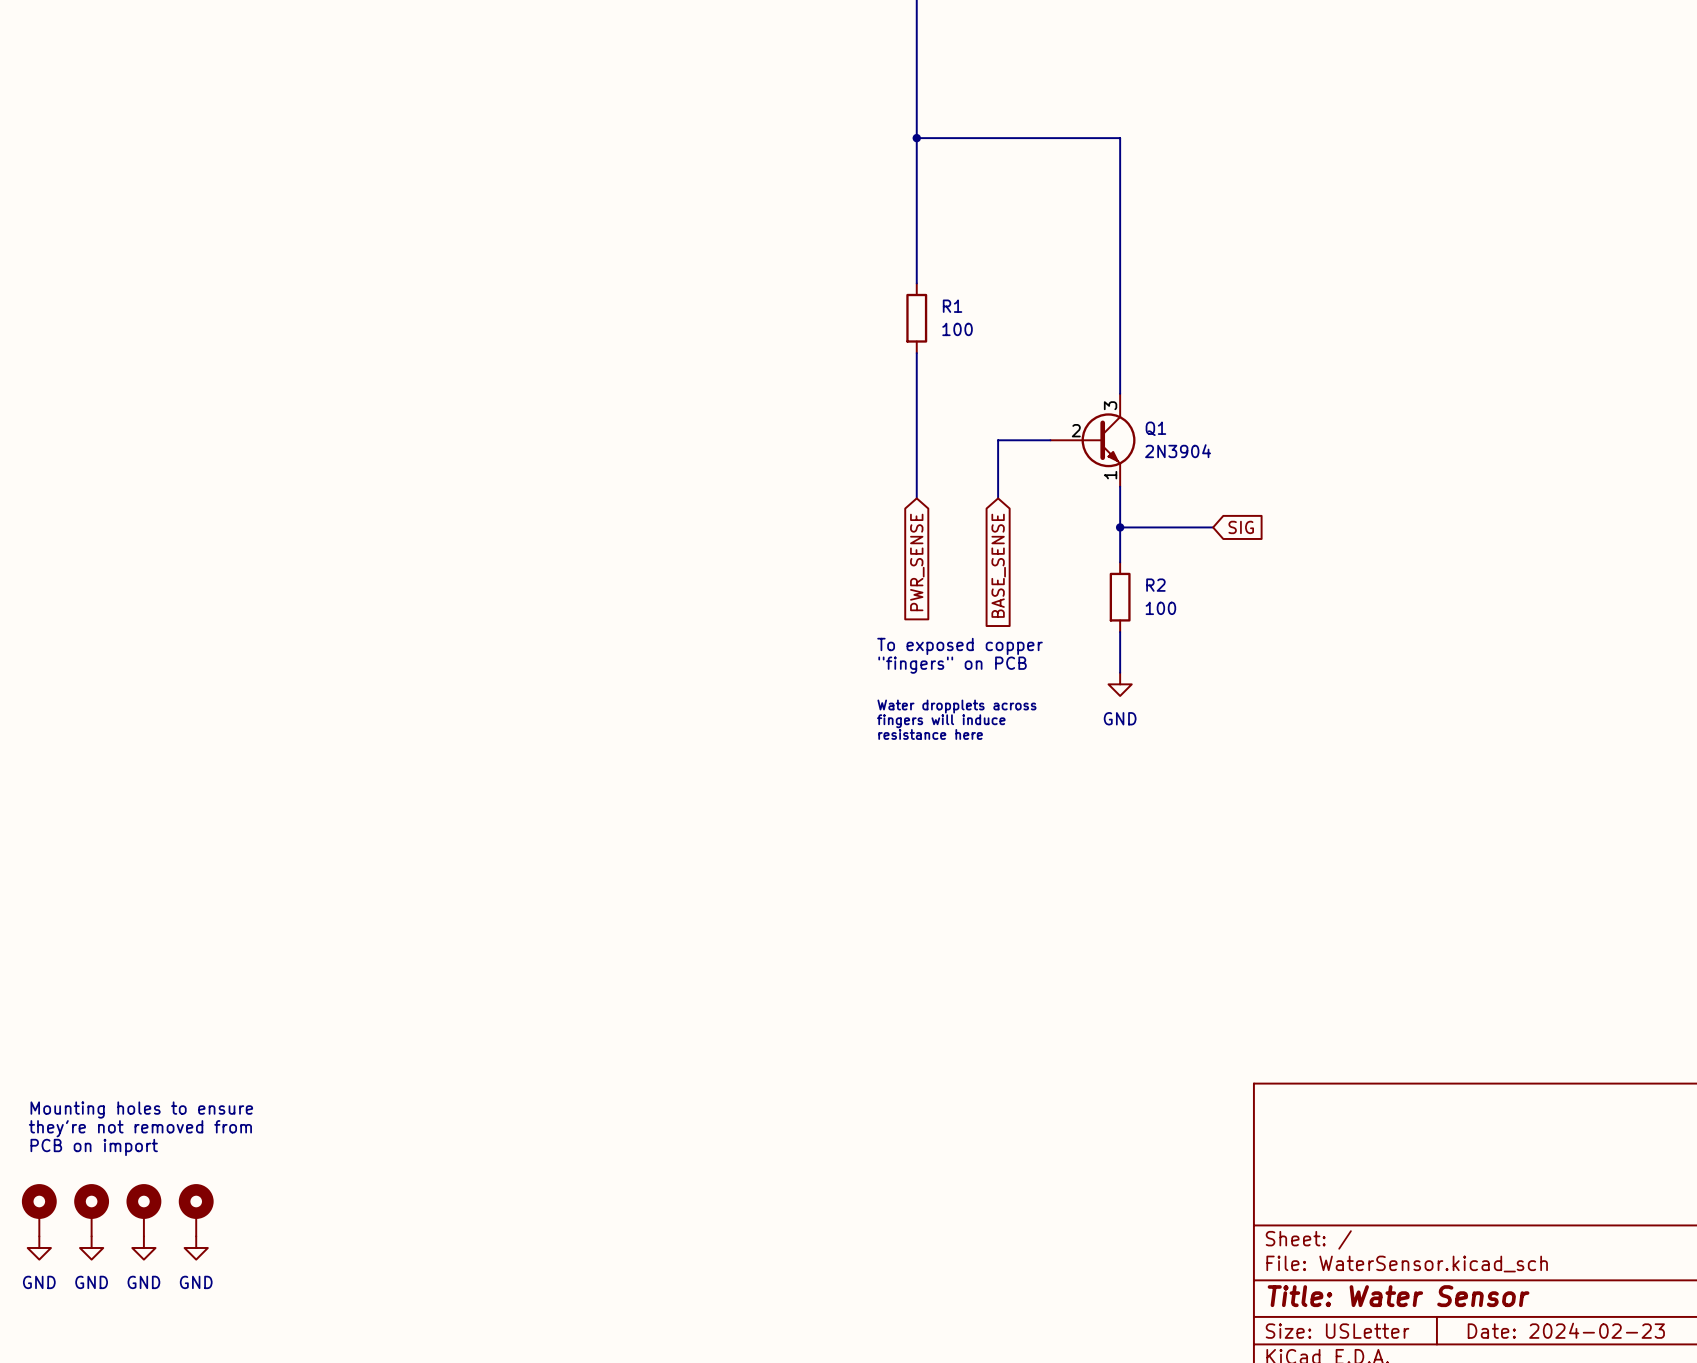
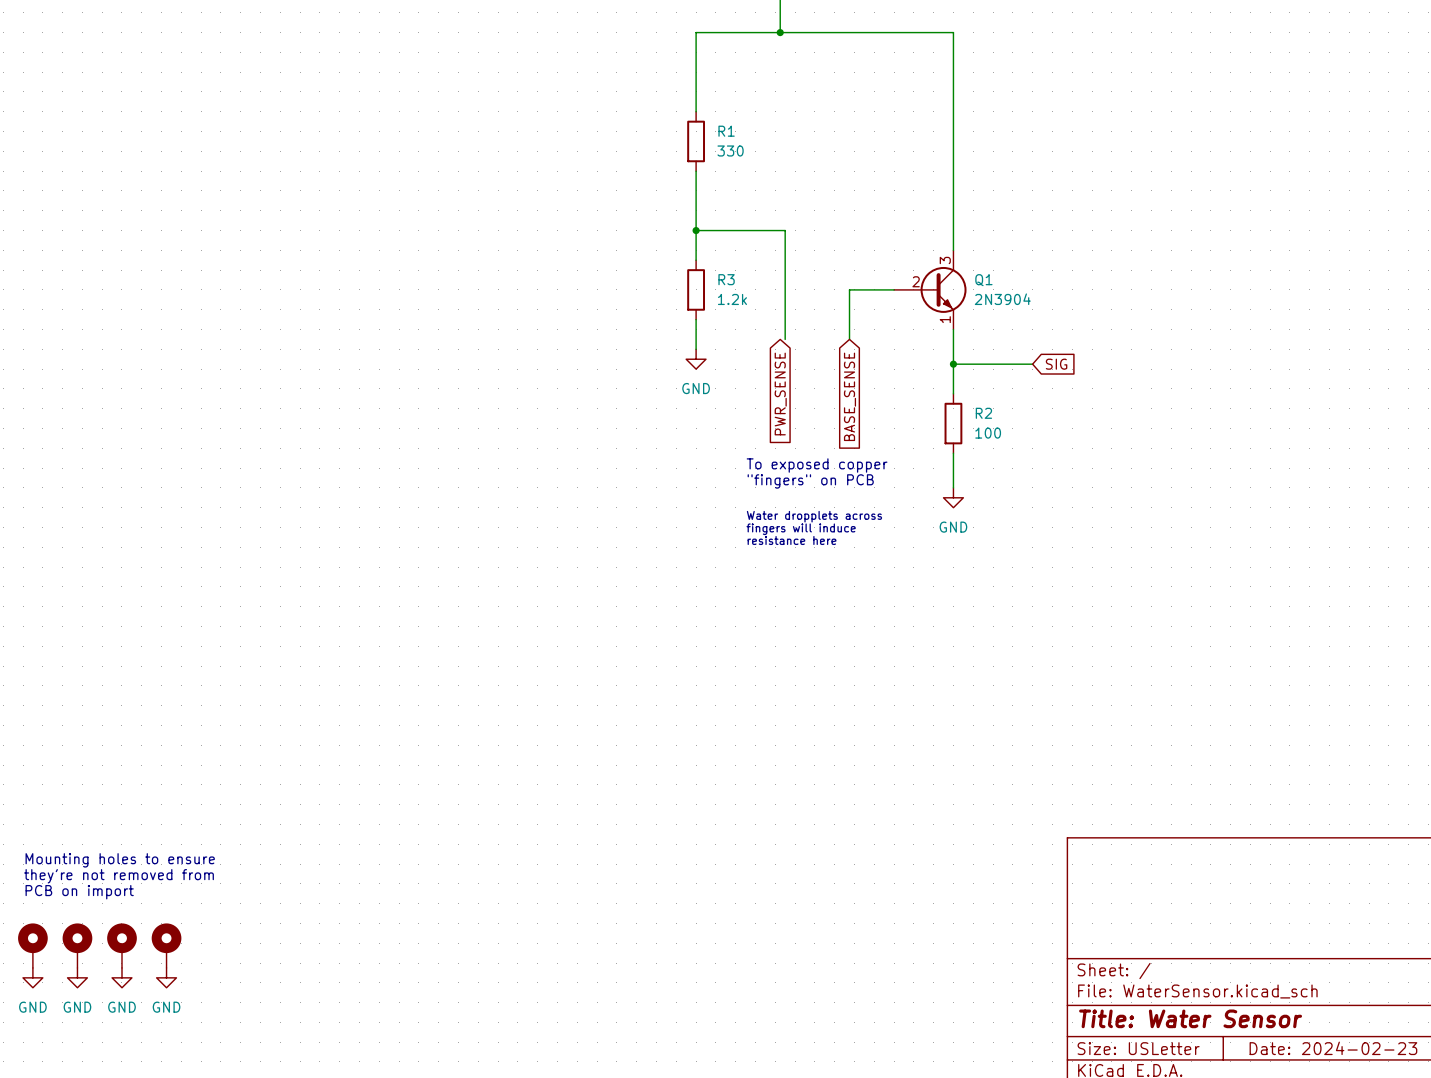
wire: (916, 138) (916, 283) -> (780, 32) (696, 32) (696, 111)
wire: none -> (696, 171) (696, 260)
R1 position: (916, 318) -> (696, 141)
R1 value: 100 (957, 329) -> 330 (730, 150)
wire: (916, 353) (916, 498) -> none
wire: none -> (696, 230) (785, 230) (785, 339)
junction: none -> (696, 230)
R3: none -> 1.2k (696, 289)
wire: none -> (696, 319) (696, 349)
power symbol: none -> GND (696, 359)

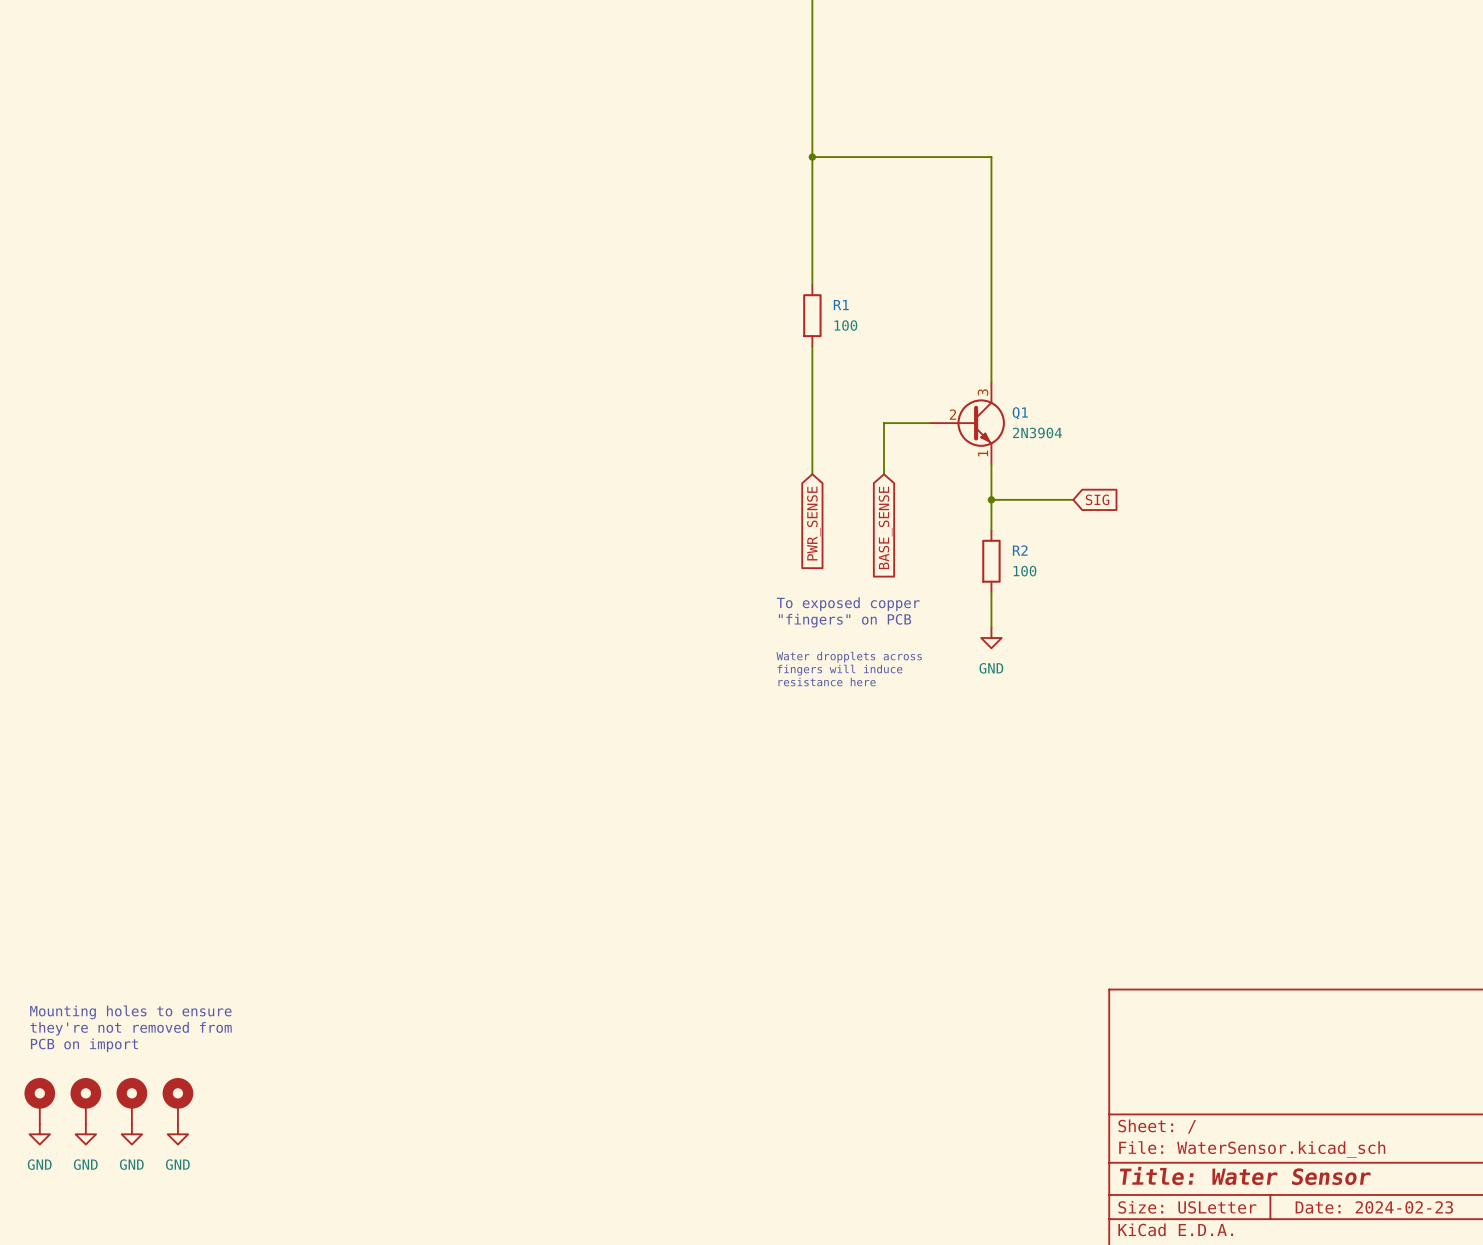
wire: (780, 32) (696, 32) (696, 111) -> (812, 157) (812, 284)
R1 position: (696, 141) -> (812, 315)
R1 value: 330 (730, 150) -> 100 (845, 325)
wire: (696, 171) (696, 260) -> none
wire: none -> (812, 346) (812, 474)
wire: (696, 230) (785, 230) (785, 339) -> none
junction: (696, 230) -> none
R3: 1.2k (696, 289) -> none
wire: (696, 319) (696, 349) -> none
power symbol: GND (696, 359) -> none

